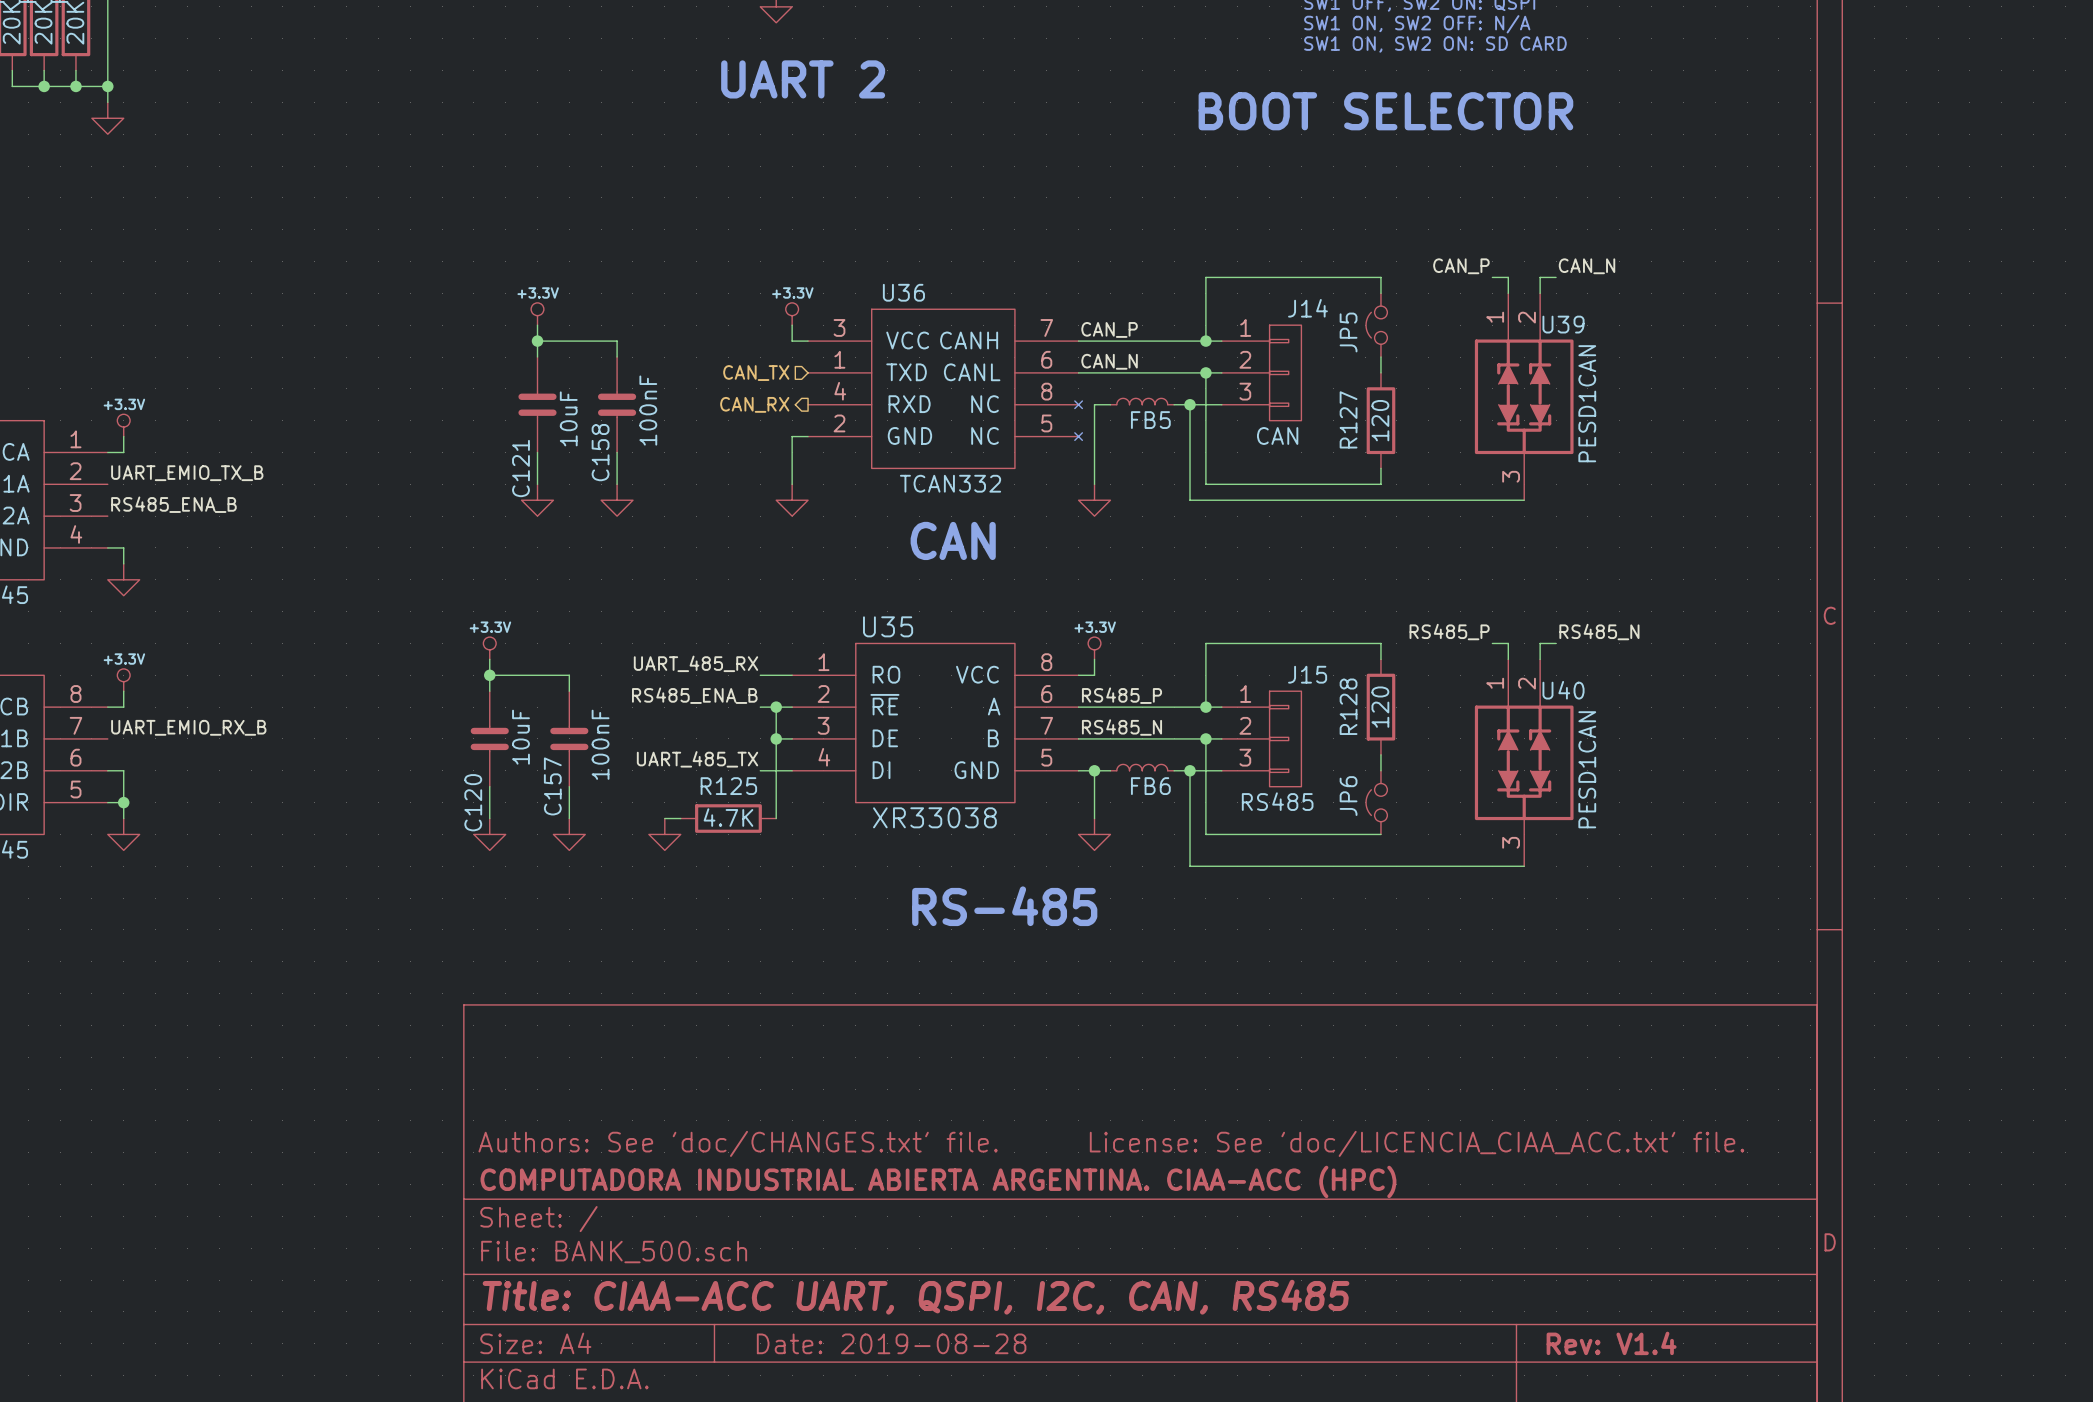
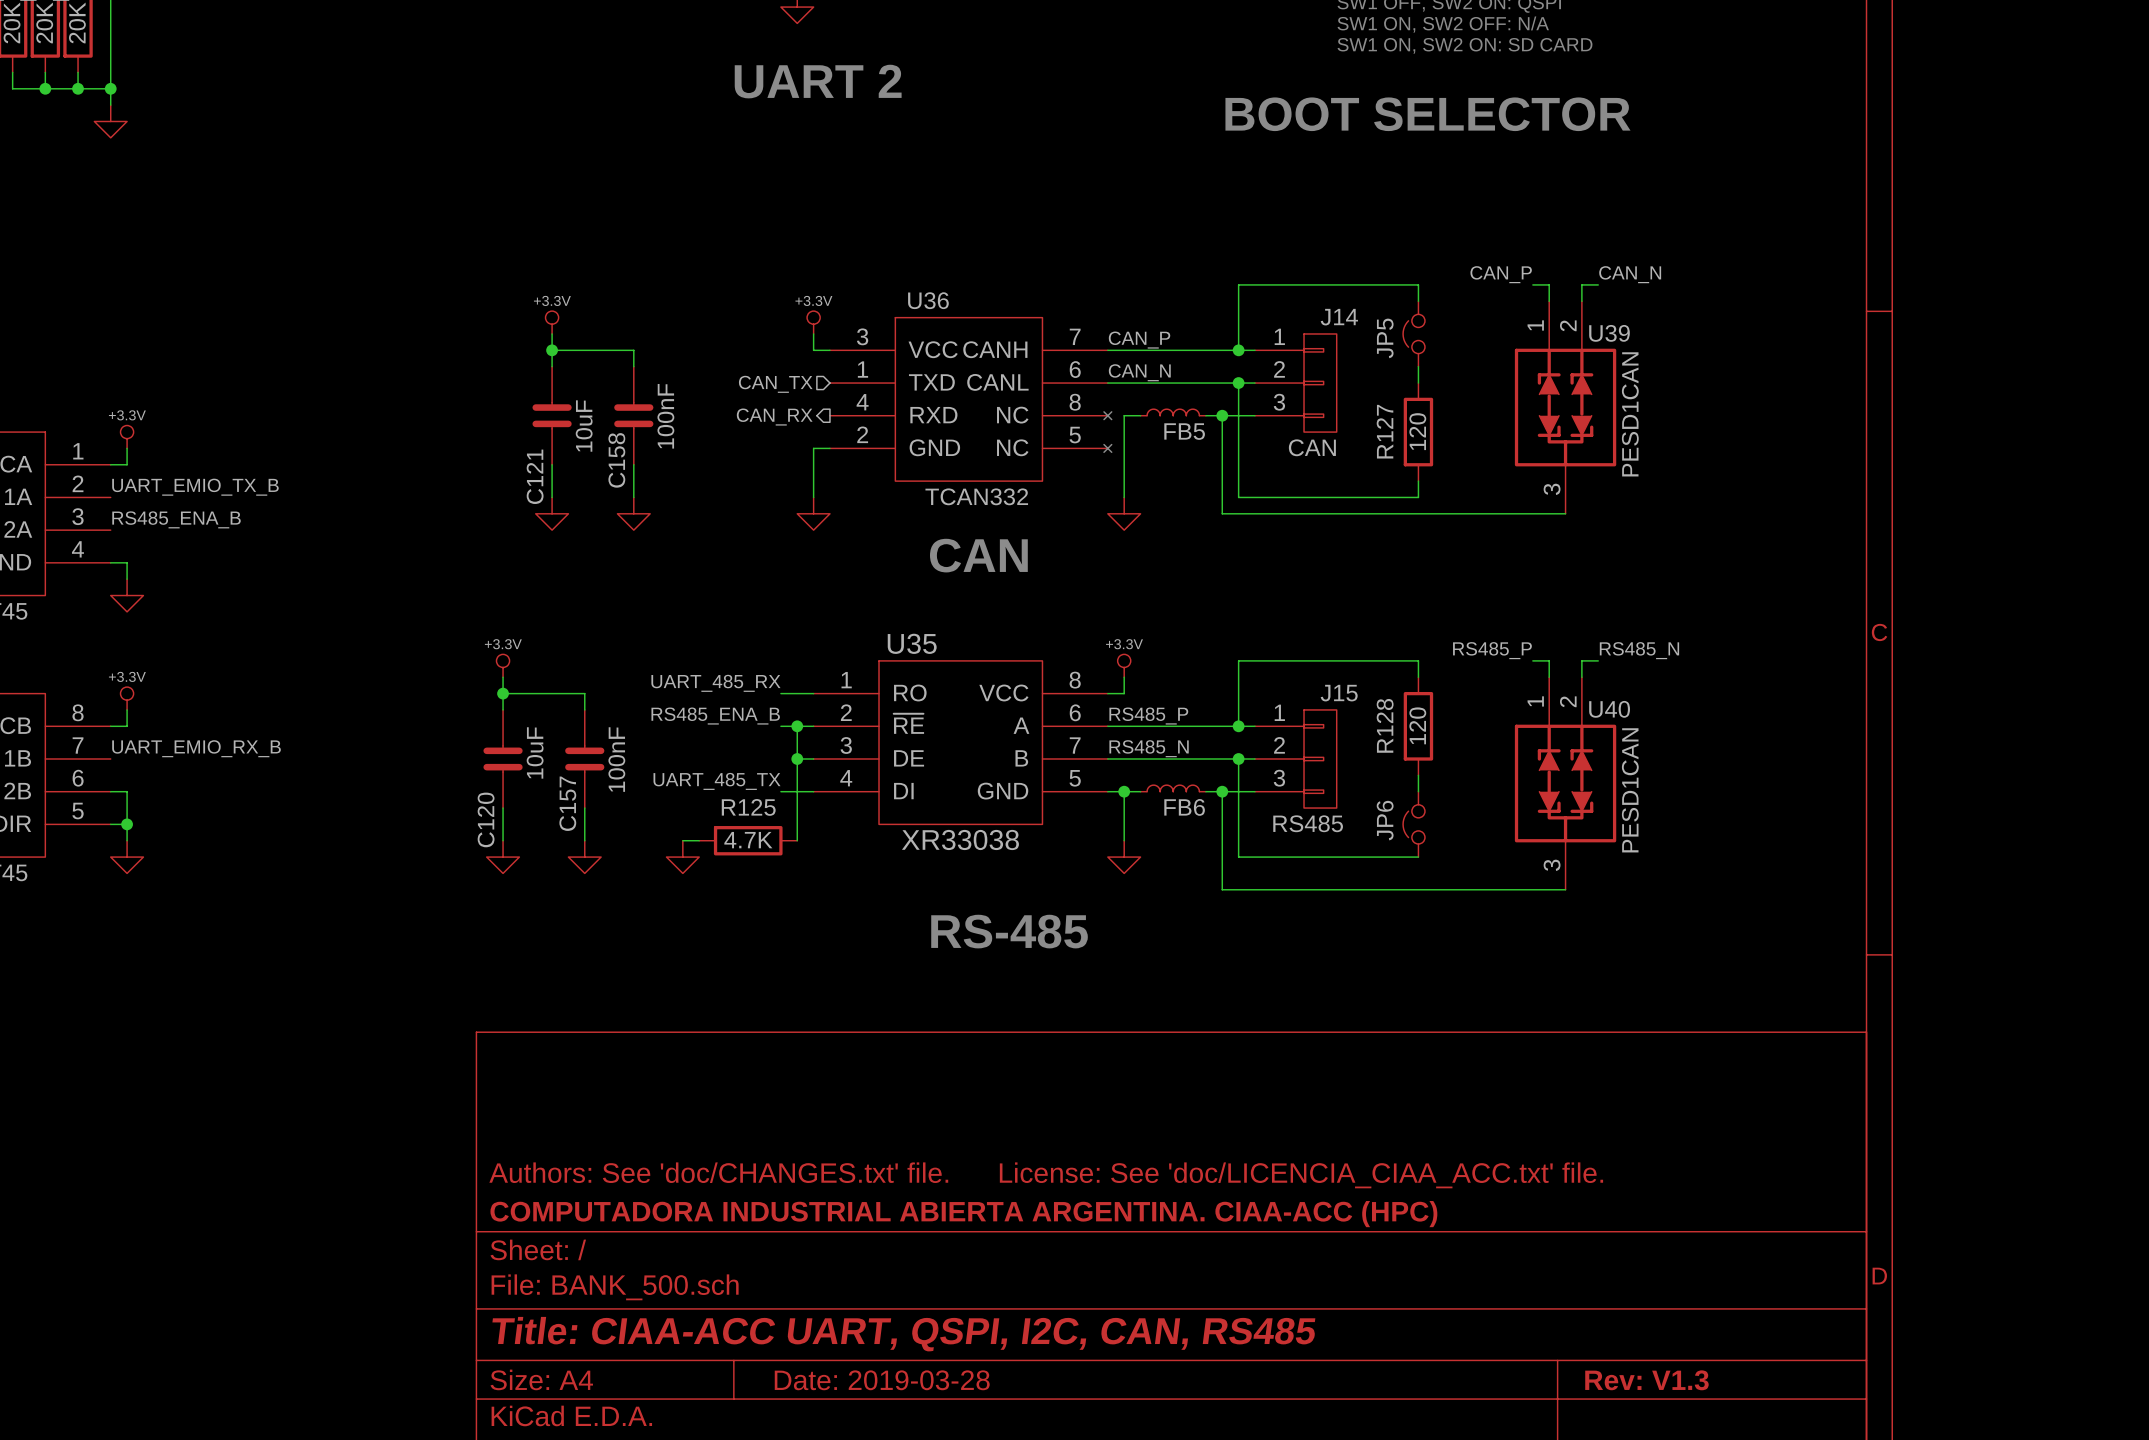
title block: Date: 2019-08-28 (891, 1343) -> Date: 2019-03-28 (882, 1380)
title block: Rev: V1.4 (1611, 1343) -> Rev: V1.3 (1646, 1380)

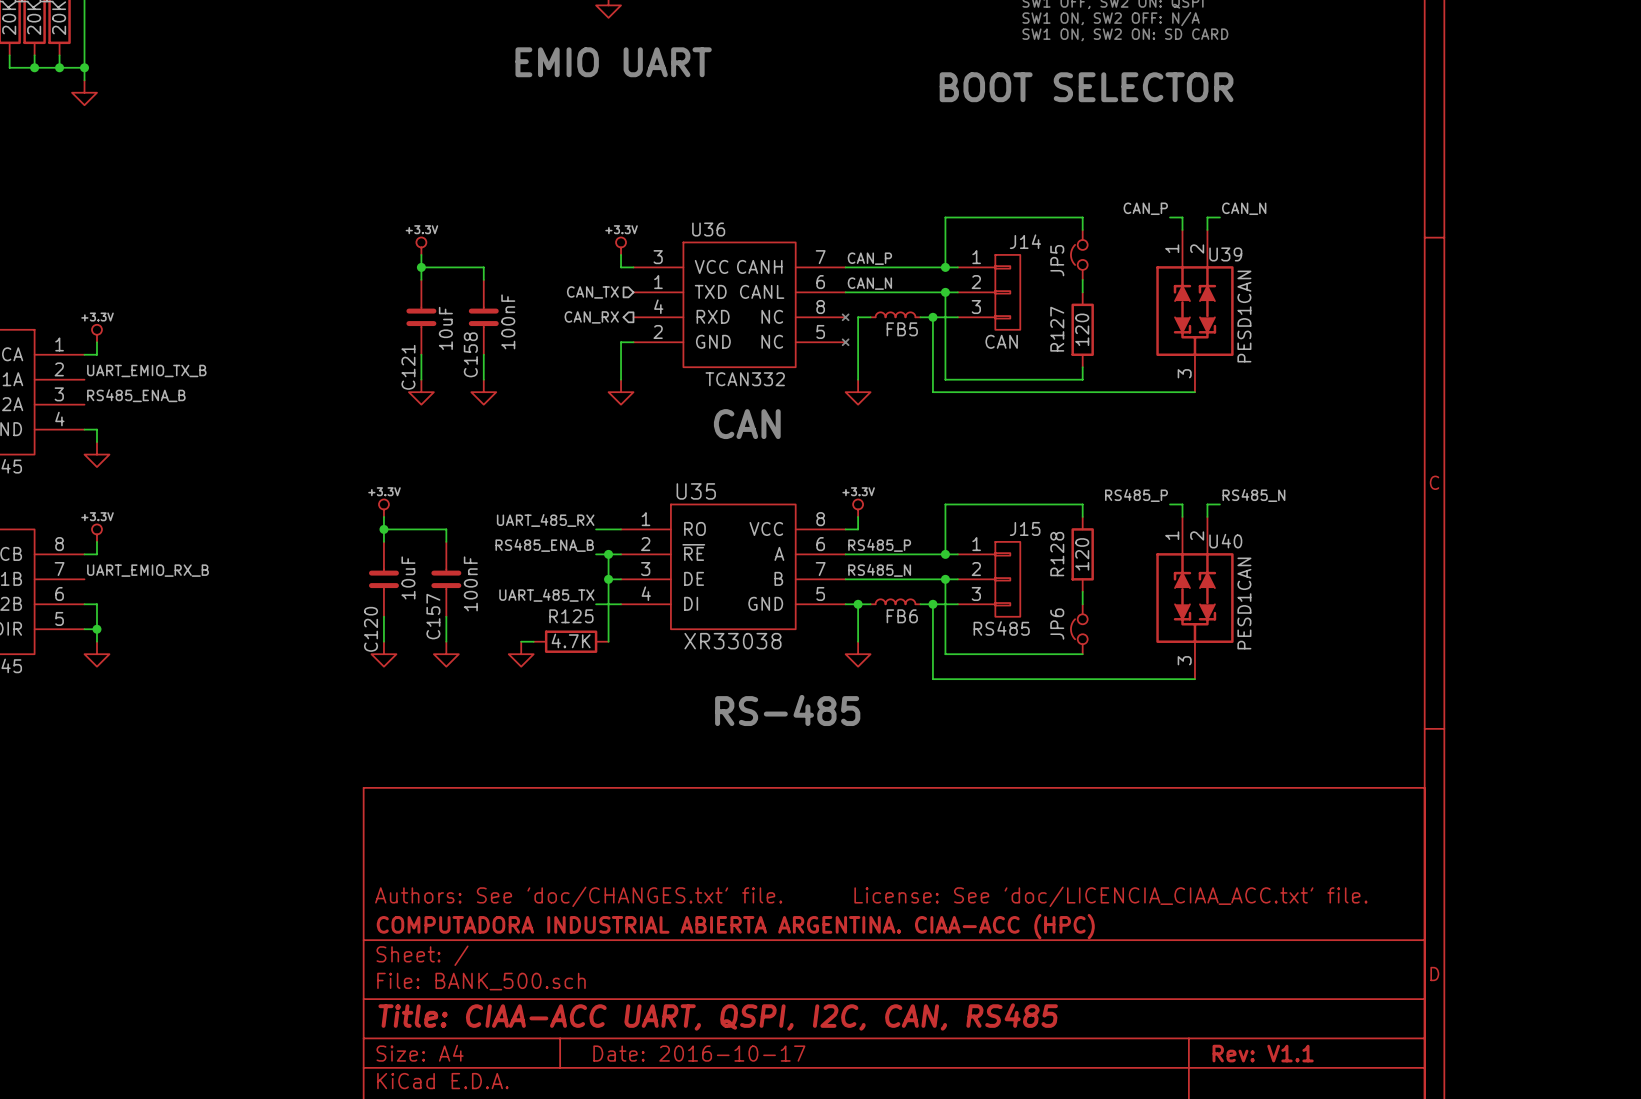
text: none -> EMIO UART (613, 62)
text: UART 2 (818, 81) -> none
title block: Date: 2019-03-28 (882, 1380) -> Date: 2016-10-17 (699, 1053)
title block: Rev: V1.3 (1646, 1380) -> Rev: V1.1 (1263, 1053)

